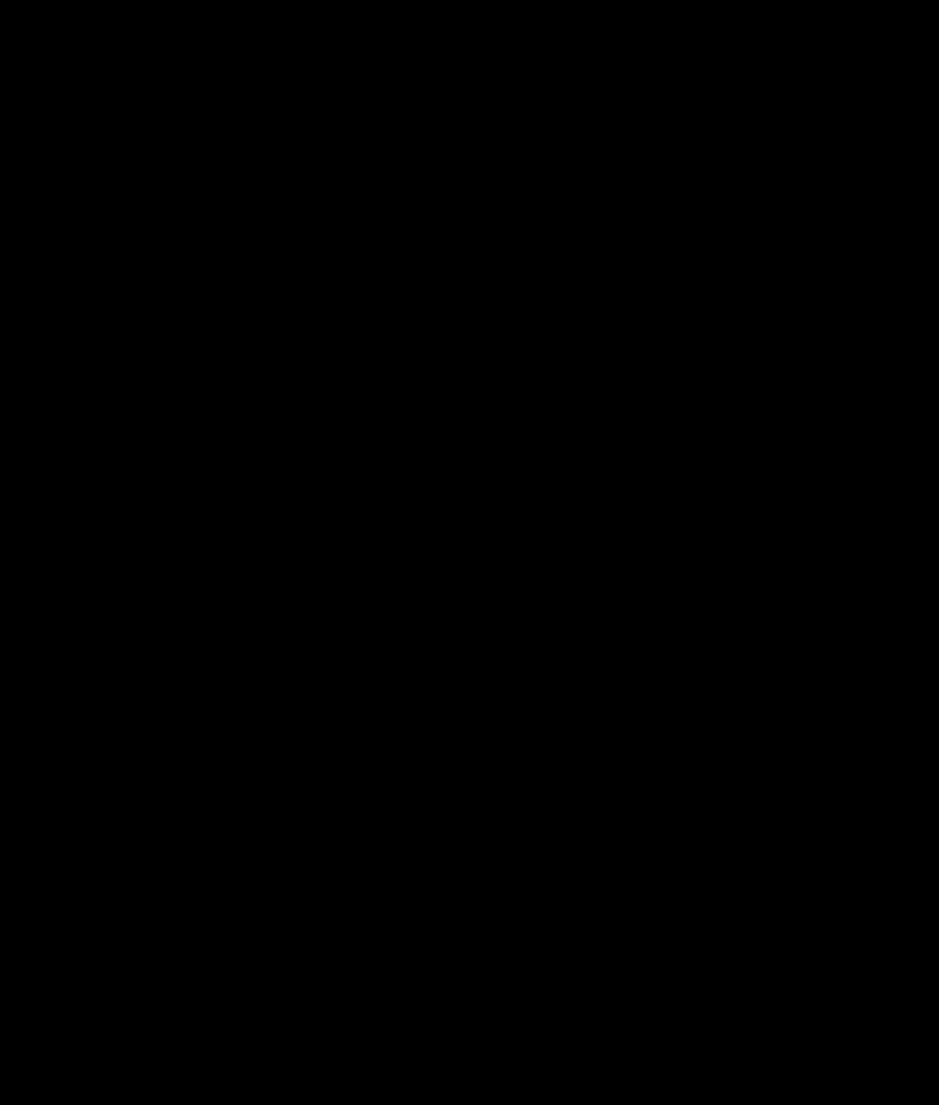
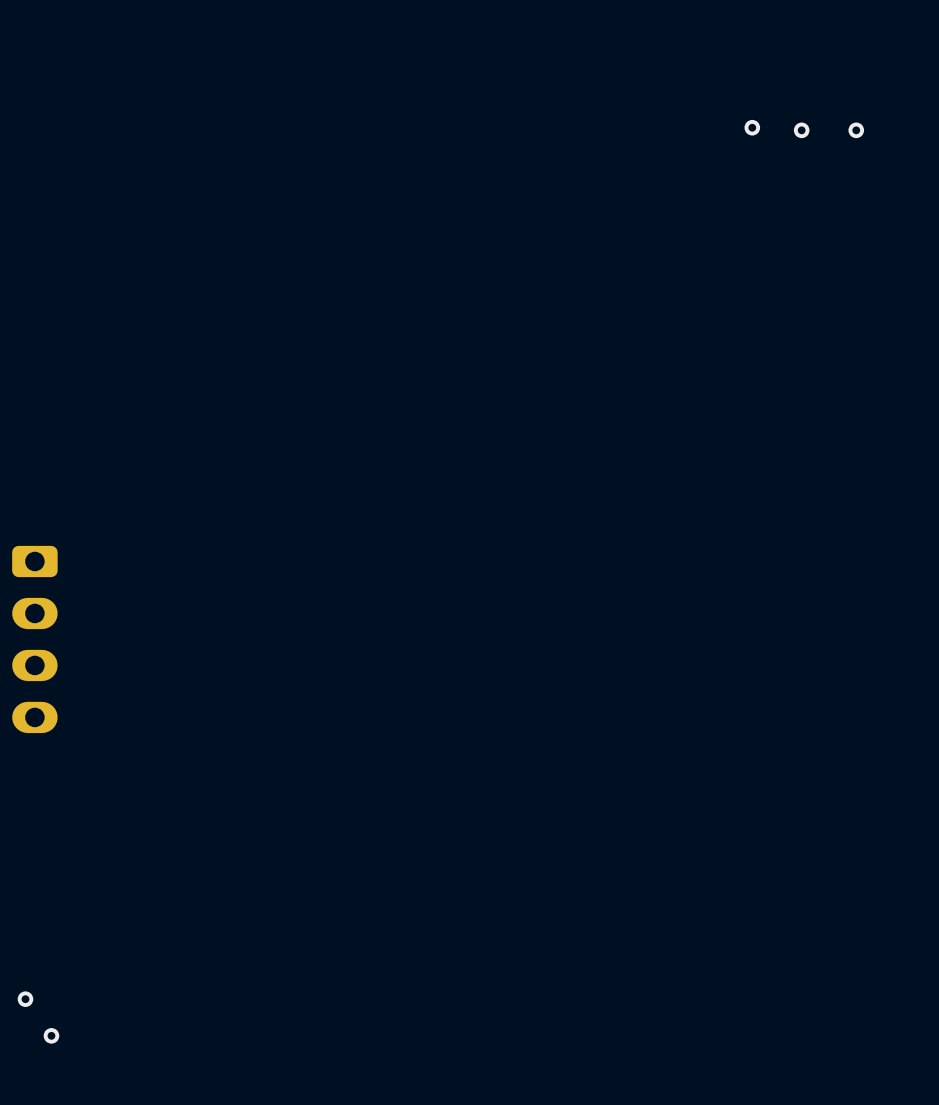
via: none -> (752, 127)
via: none -> (801, 130)
via: none -> (856, 130)
part: none -> (34, 639)
via: none -> (25, 999)
via: none -> (51, 1035)

